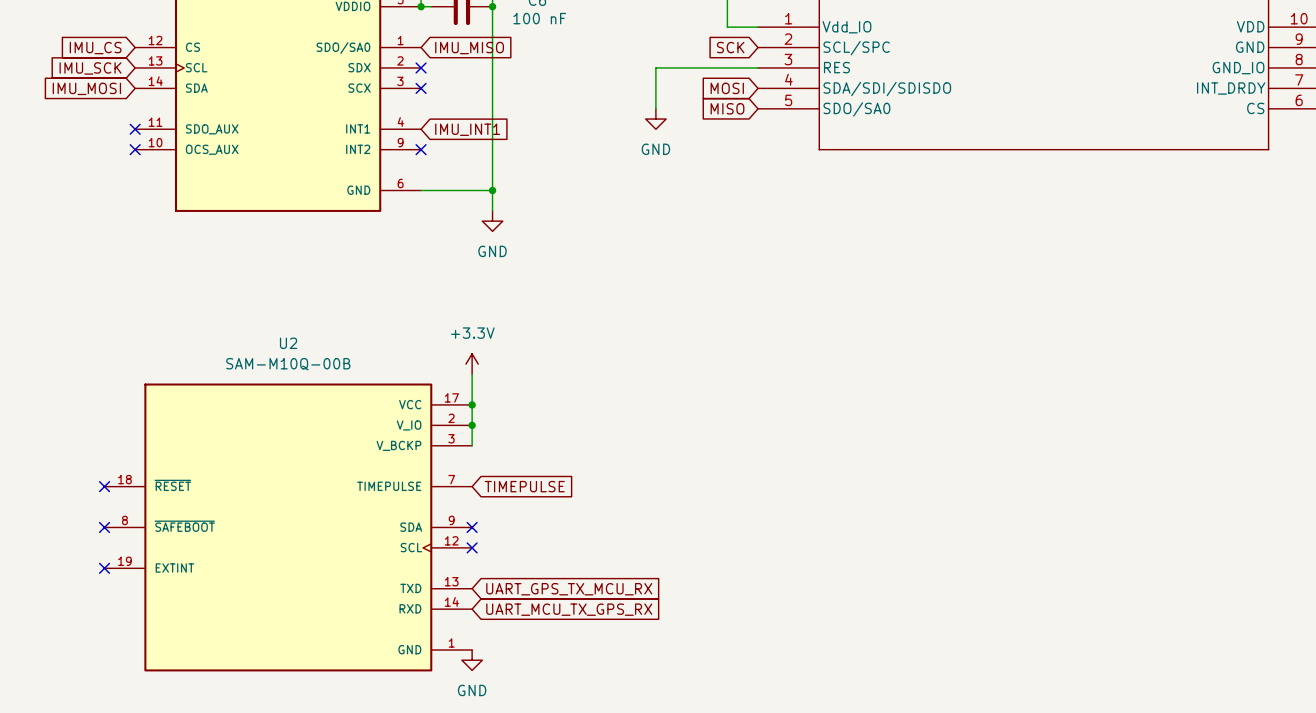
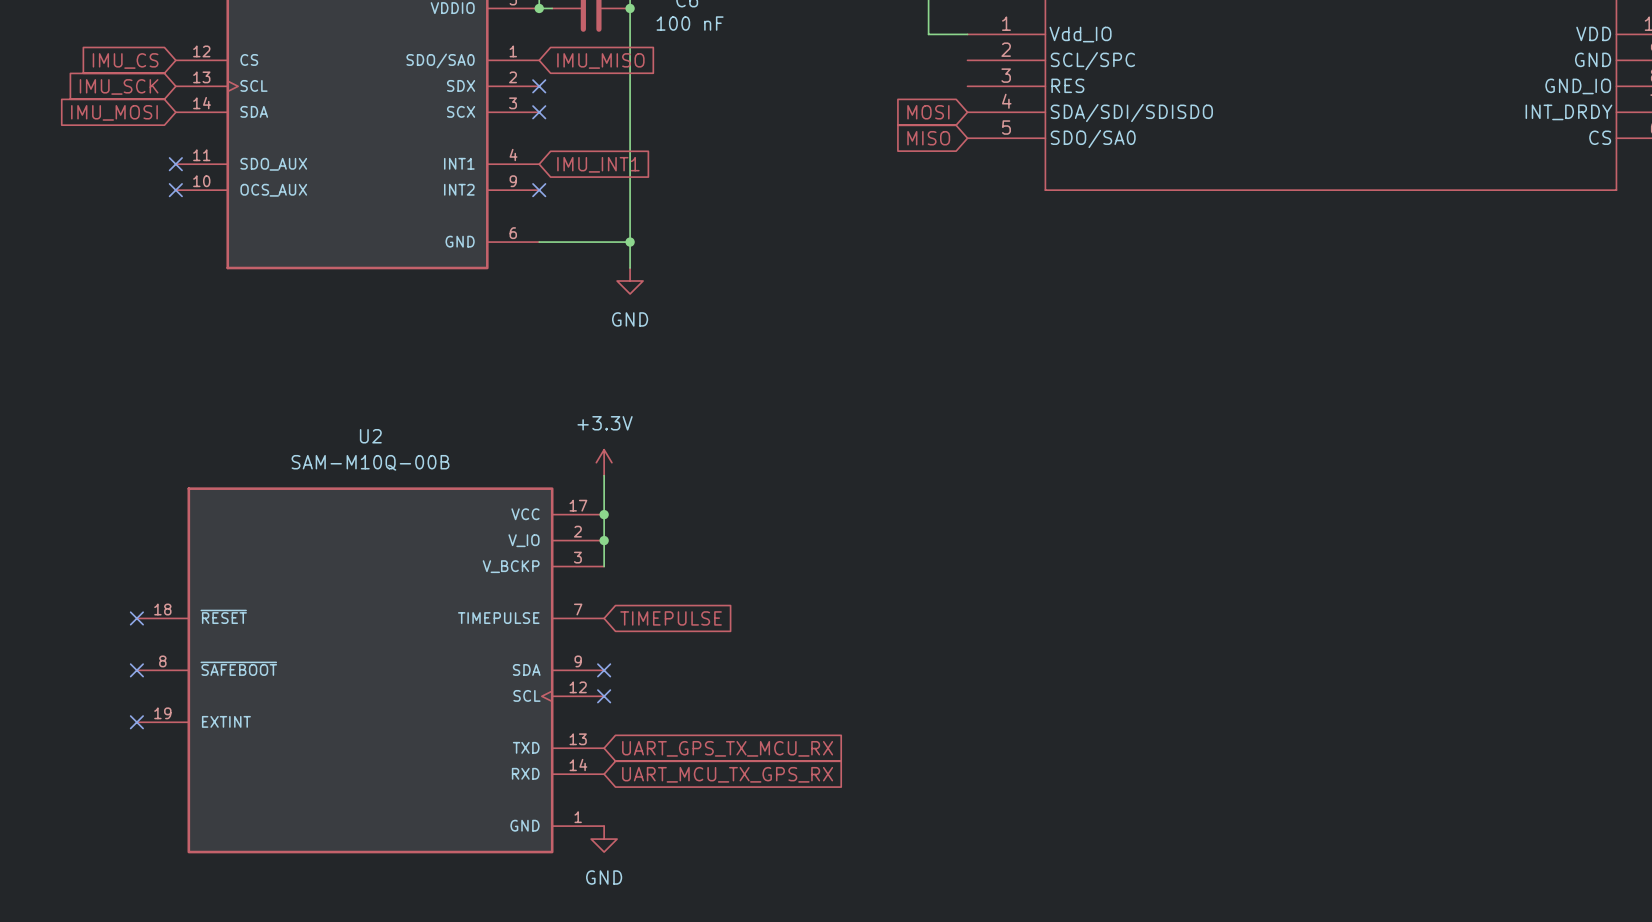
global label: SCK (730, 47) -> none
wire: (758, 67) (655, 67) (655, 108) -> none
power symbol: GND (655, 119) -> none

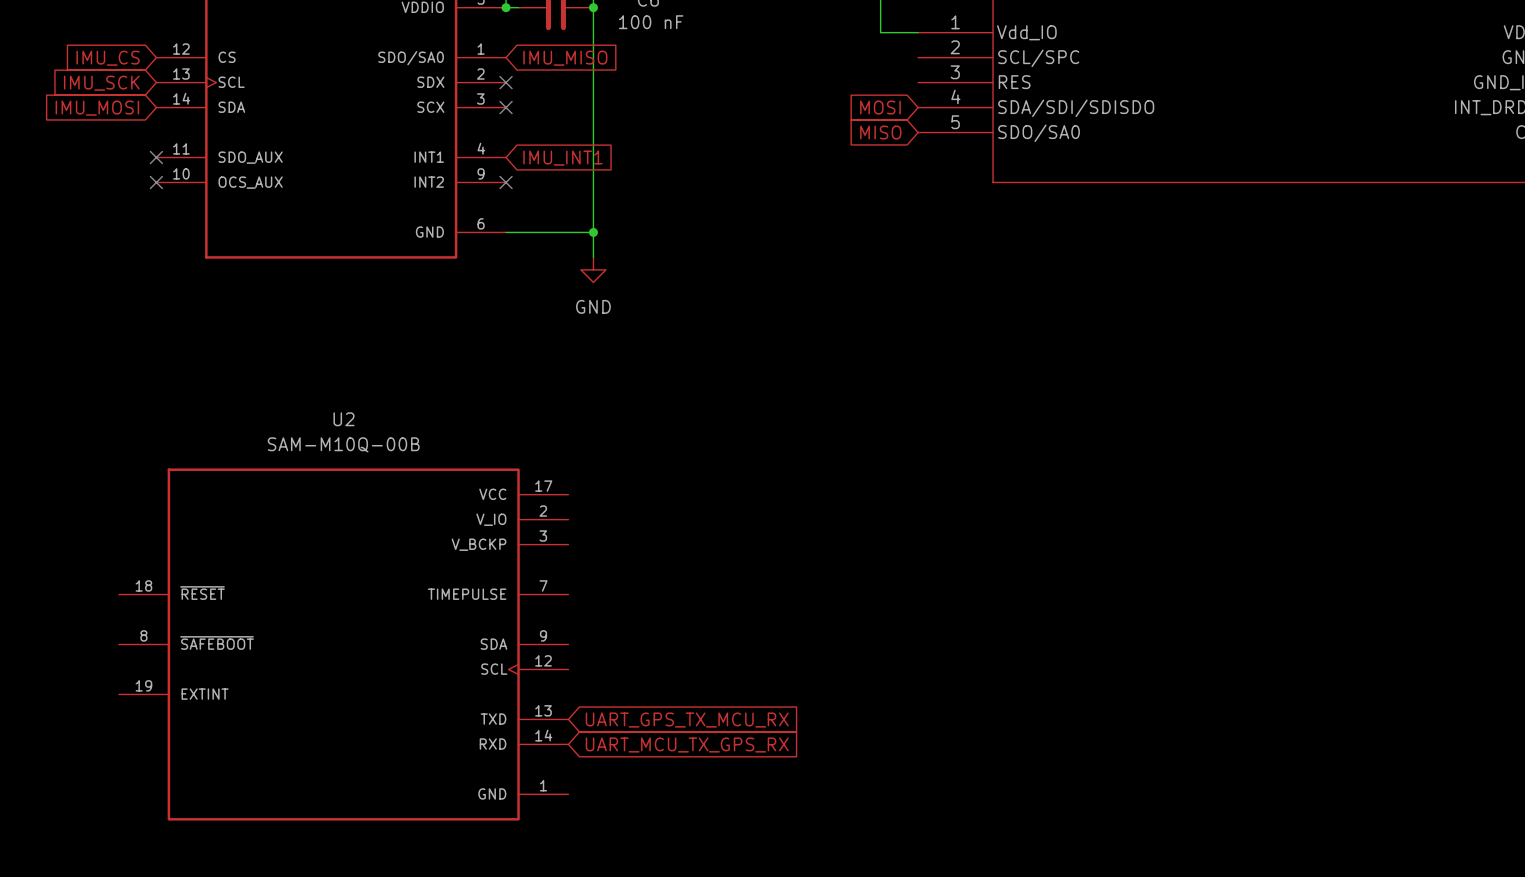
power symbol: +3.3V (604, 462) -> none
wire: (604, 475) (604, 566) -> none
junction: (604, 514) -> none
junction: (604, 540) -> none
no-connect mark: (136, 618) -> none
global label: TIMEPULSE (671, 618) -> none
no-connect mark: (136, 670) -> none
no-connect mark: (604, 670) -> none
no-connect mark: (604, 696) -> none
no-connect mark: (136, 722) -> none
power symbol: GND (604, 839) -> none

